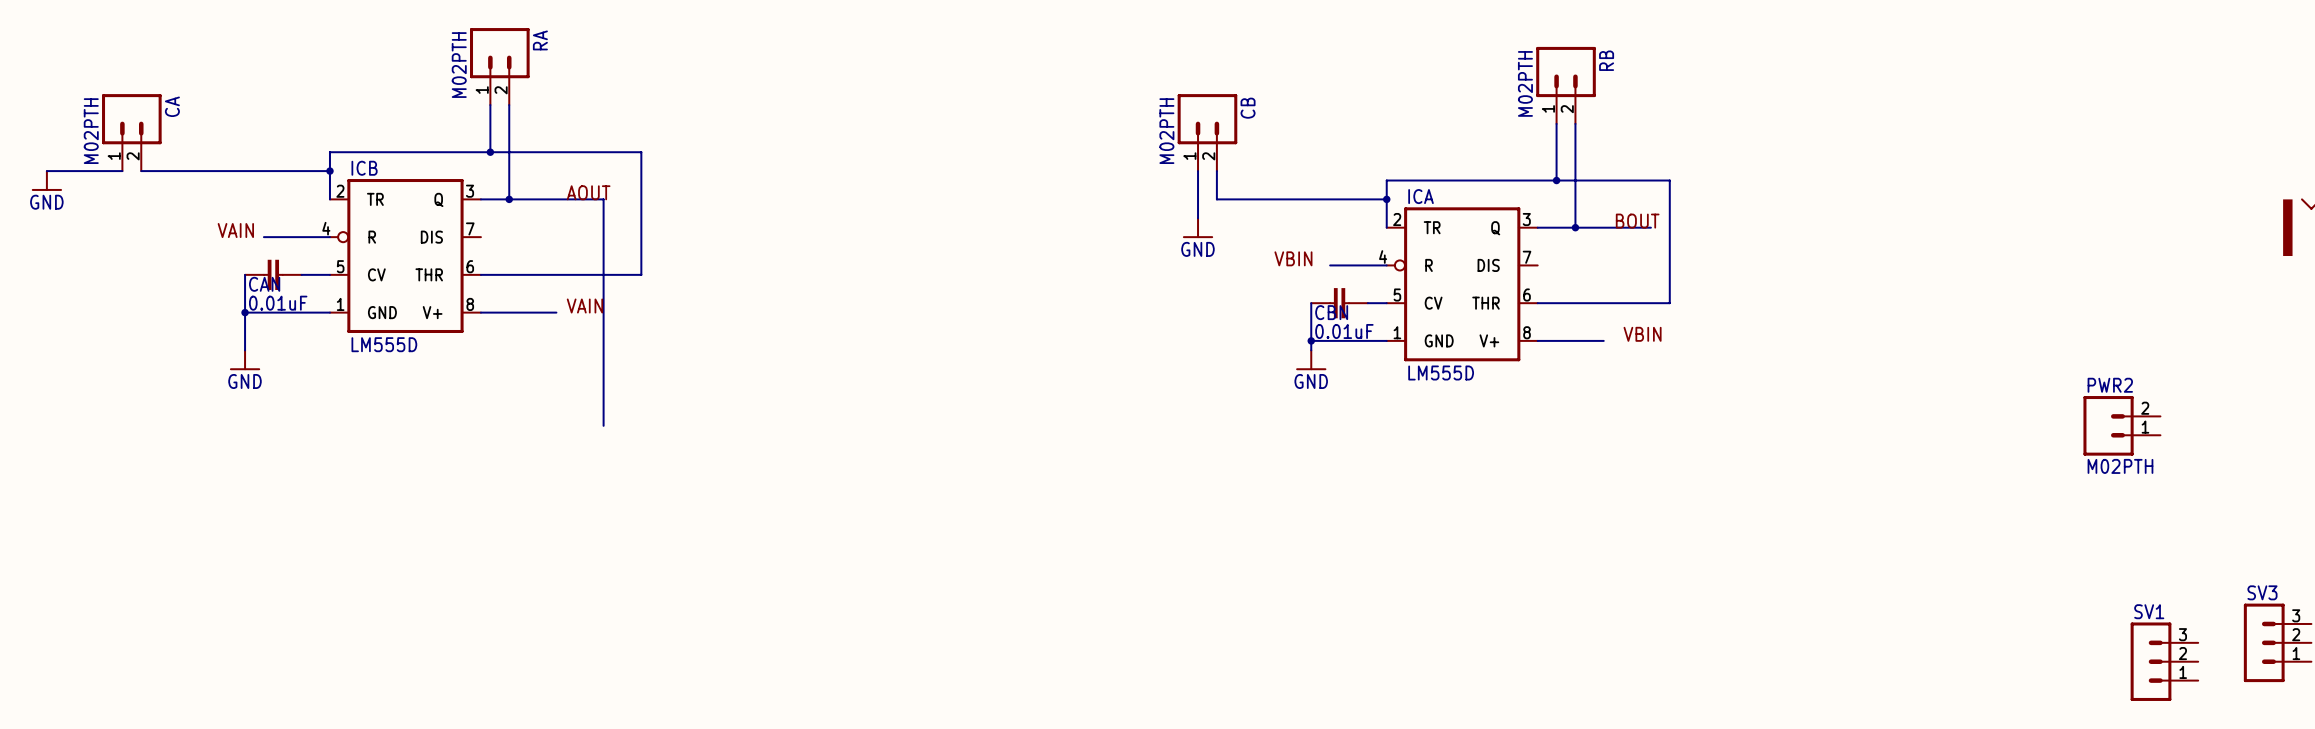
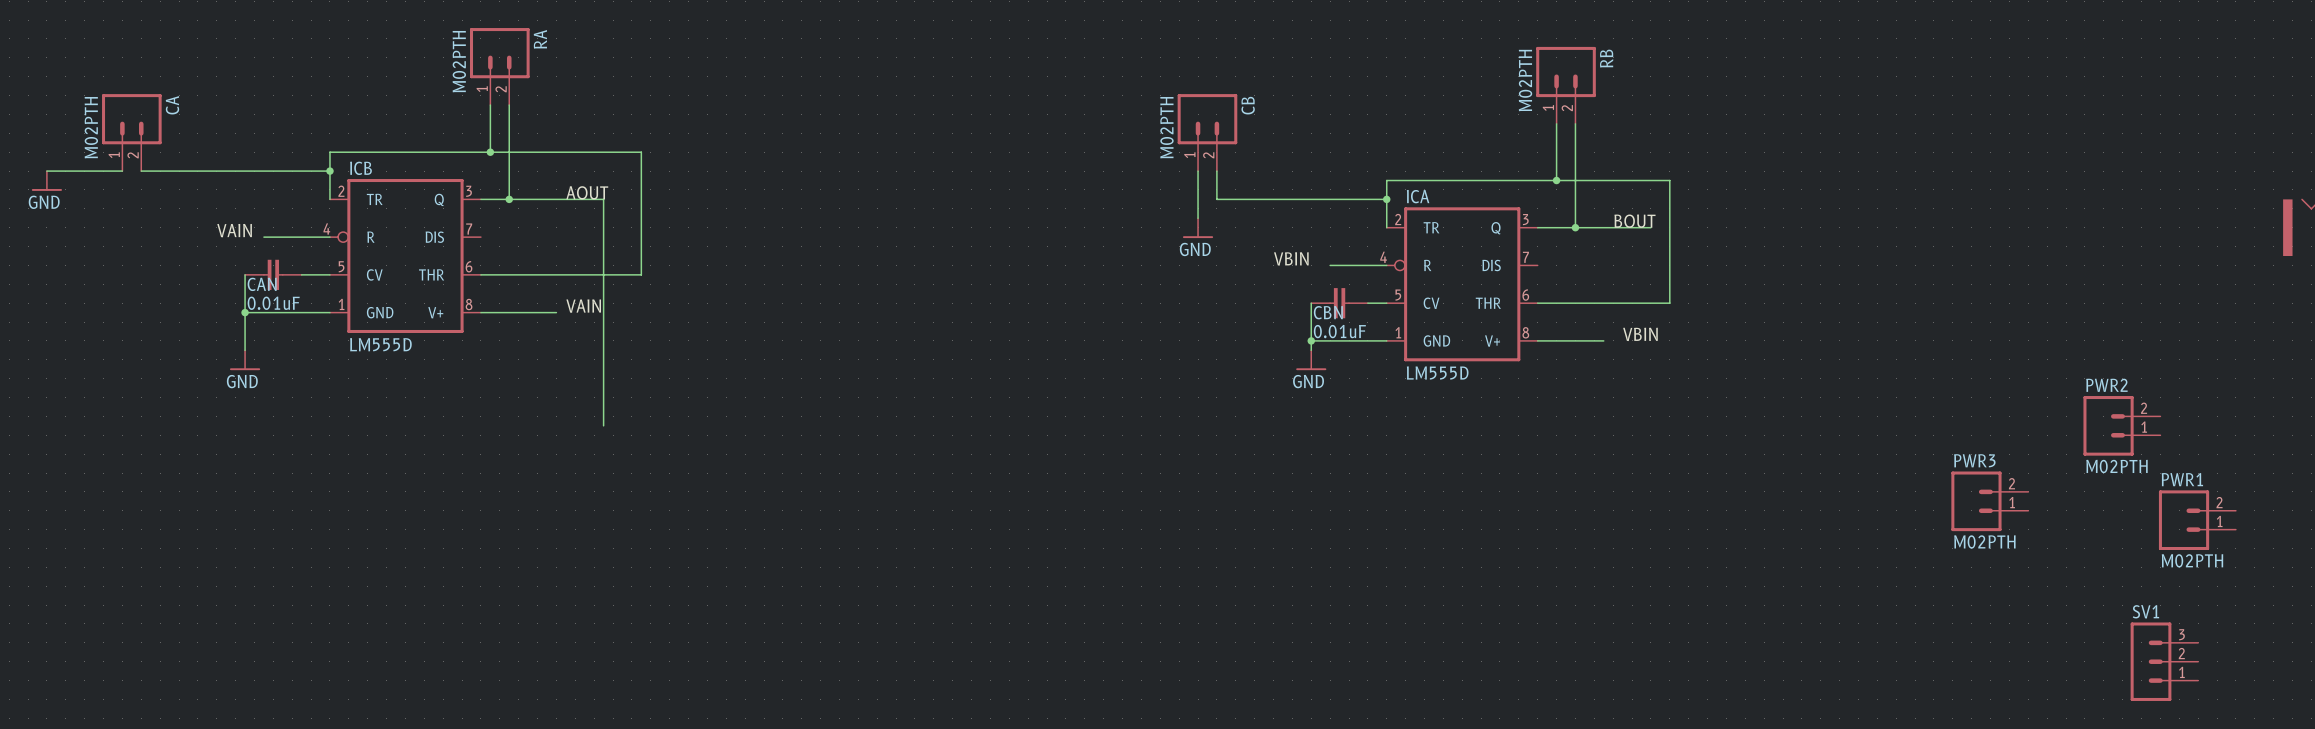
PWR3: none -> M02PTH (1989, 501)
PWR1: none -> M02PTH (2197, 520)
SV3: (2277, 642) -> none

